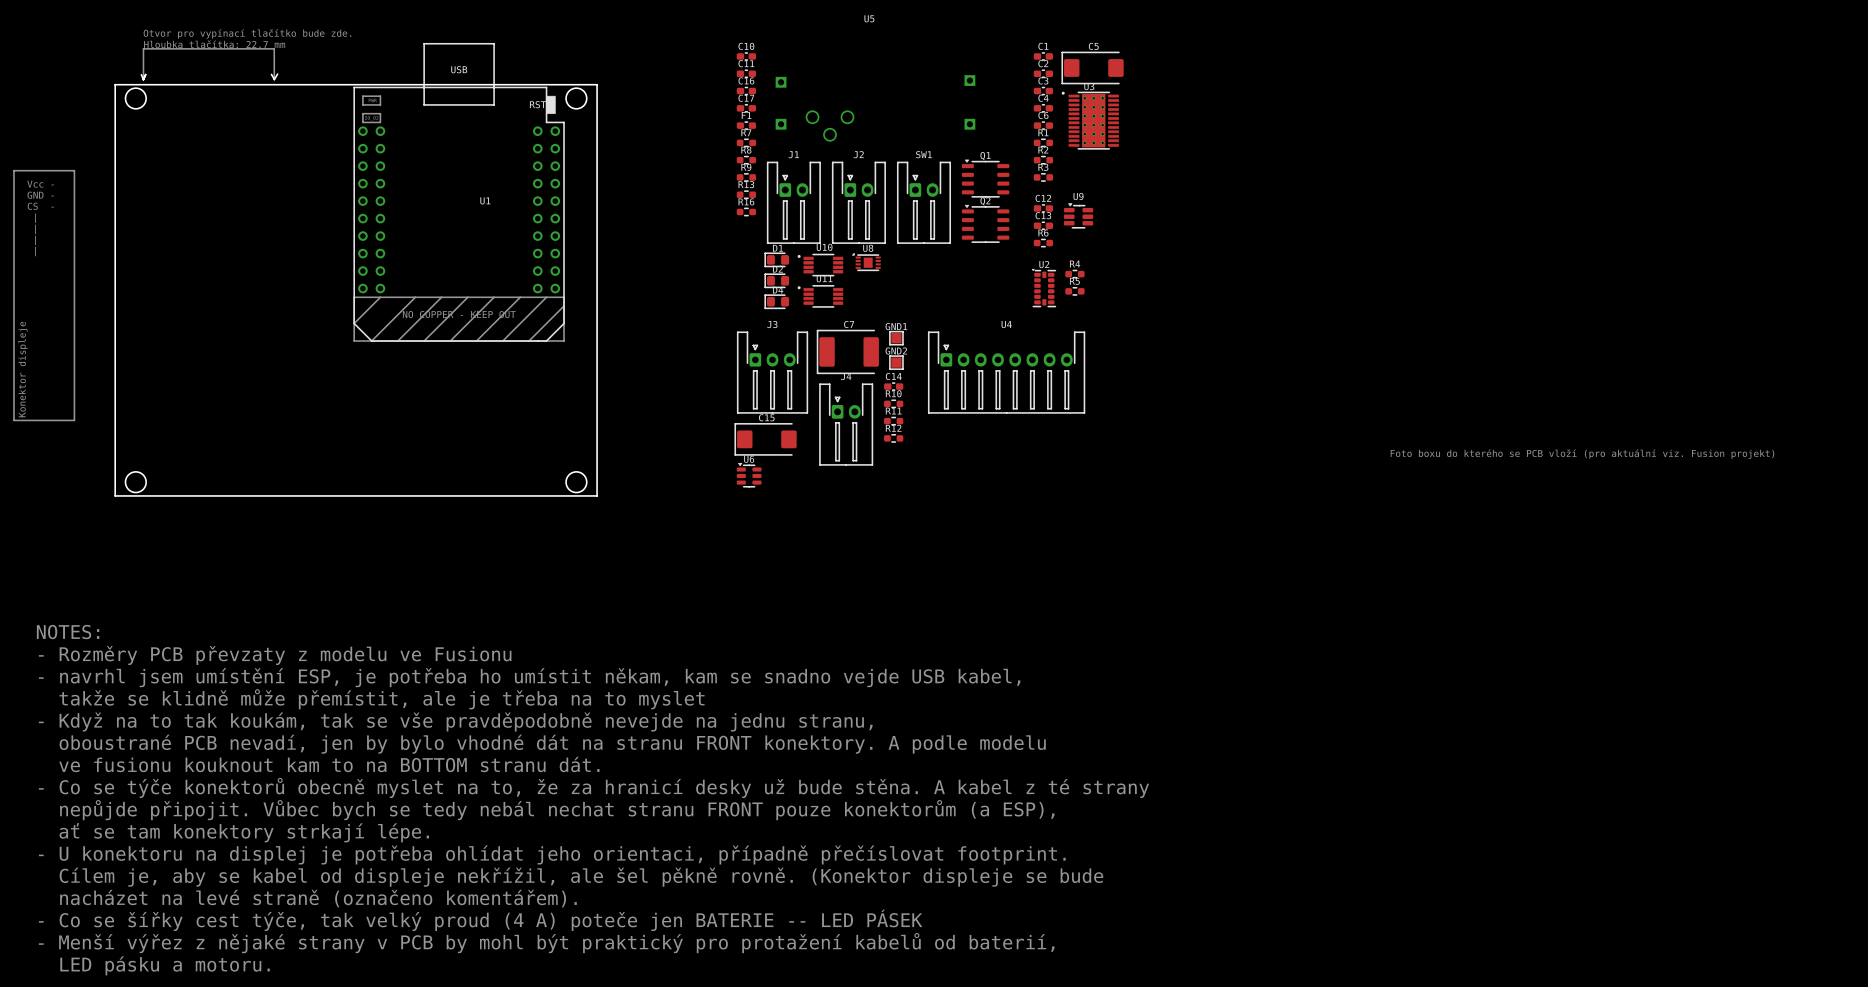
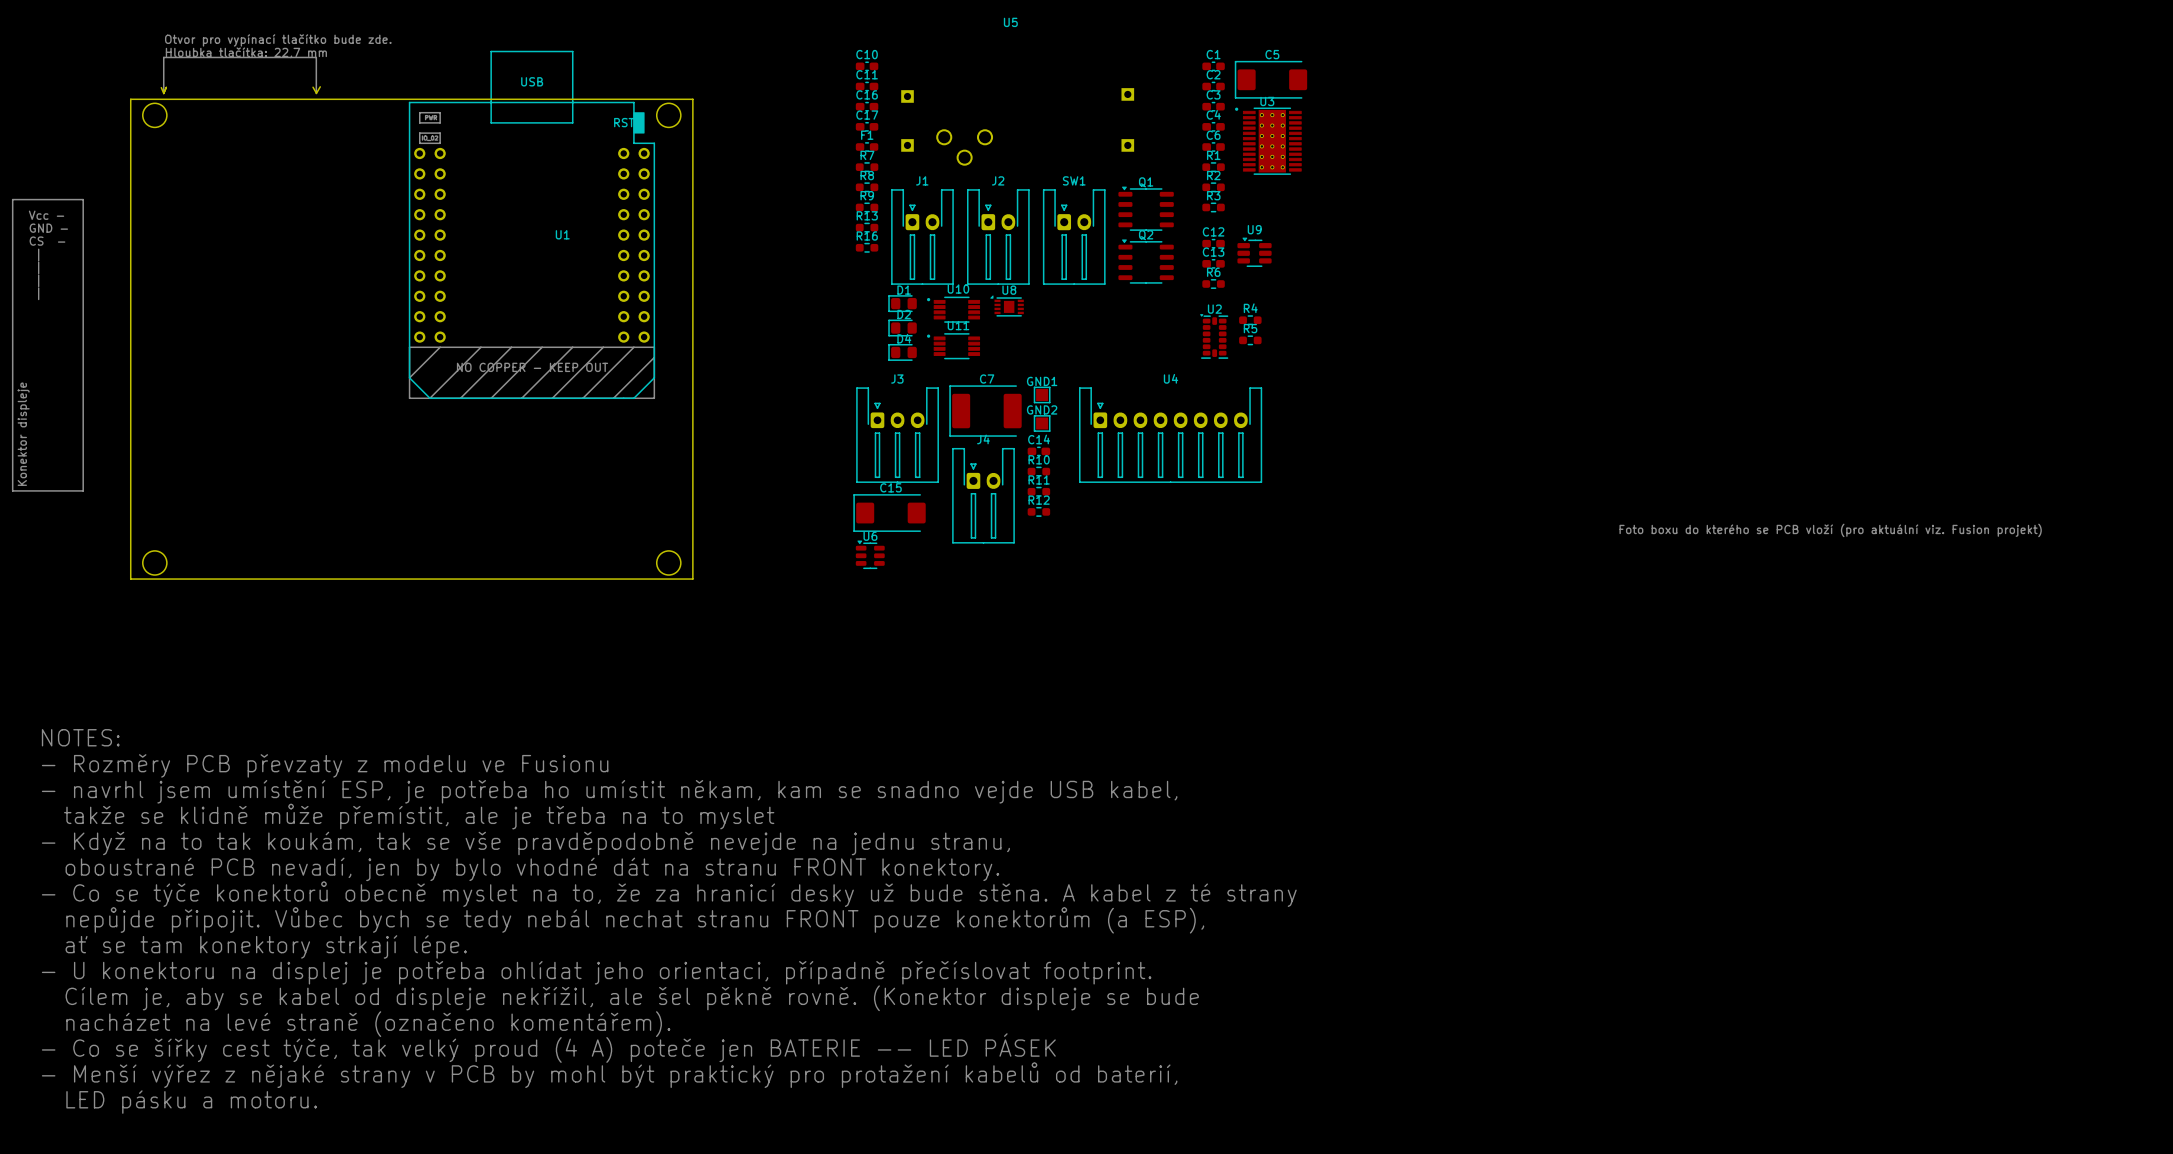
text: oboustrané PCB nevadí, jen by bylo vhodné dát na stranu FRONT konektory. A podle modelu (552, 744) -> oboustrané PCB nevadí, jen by bylo vhodné dát na stranu FRONT konektory. (532, 869)
text: ve fusionu kouknout kam to na BOTTOM stranu dát. (329, 764) -> - Co se týče konektorů obecně myslet na to, že za hranicí desky už bude stěna. A kabel z té strany (669, 894)
text: - Co se týče konektorů obecně myslet na to, že za hranicí desky už bude stěna. A kabel z té strany (593, 787) -> nepůjde připojit. Vůbec bych se tedy nebál nechat stranu FRONT pouze konektorům (a ESP), (635, 920)
text: nepůjde připojit. Vůbec bych se tedy nebál nechat stranu FRONT pouze konektorům (a ESP), (557, 810) -> ať se tam konektory strkají lépe. (266, 946)
text: ať se tam konektory strkají lépe. (244, 832) -> - U konektoru na displej je potřeba ohlídat jeho orientaci, případně přečíslovat footprint. (596, 972)
text: - U konektoru na displej je potřeba ohlídat jeho orientaci, případně přečíslovat footprint. (552, 854) -> Cílem je, aby se kabel od displeje nekřížil, ale šel pěkně rovně. (Konektor displeje se bude (632, 998)
text: Cílem je, aby se kabel od displeje nekřížil, ale šel pěkně rovně. (Konektor displeje se bude (581, 877) -> nacházet na levé straně (označeno komentářem). (368, 1024)
text: nacházet na levé straně (označeno komentářem). (318, 898) -> - Co se šířky cest týče, tak velký proud (4 A) poteče jen BATERIE -- LED PÁSEK (548, 1048)
text: - Co se šířky cest týče, tak velký proud (4 A) poteče jen BATERIE -- LED PÁSEK (480, 920) -> - Menší výřez z nějaké strany v PCB by mohl být praktický pro protažení kabelů od baterií, (609, 1075)
text: - Menší výřez z nějaké strany v PCB by mohl být praktický pro protažení kabelů od baterií, (546, 943) -> LED pásku a motoru. (191, 1102)
text: LED pásku a motoru. (165, 965) -> none

